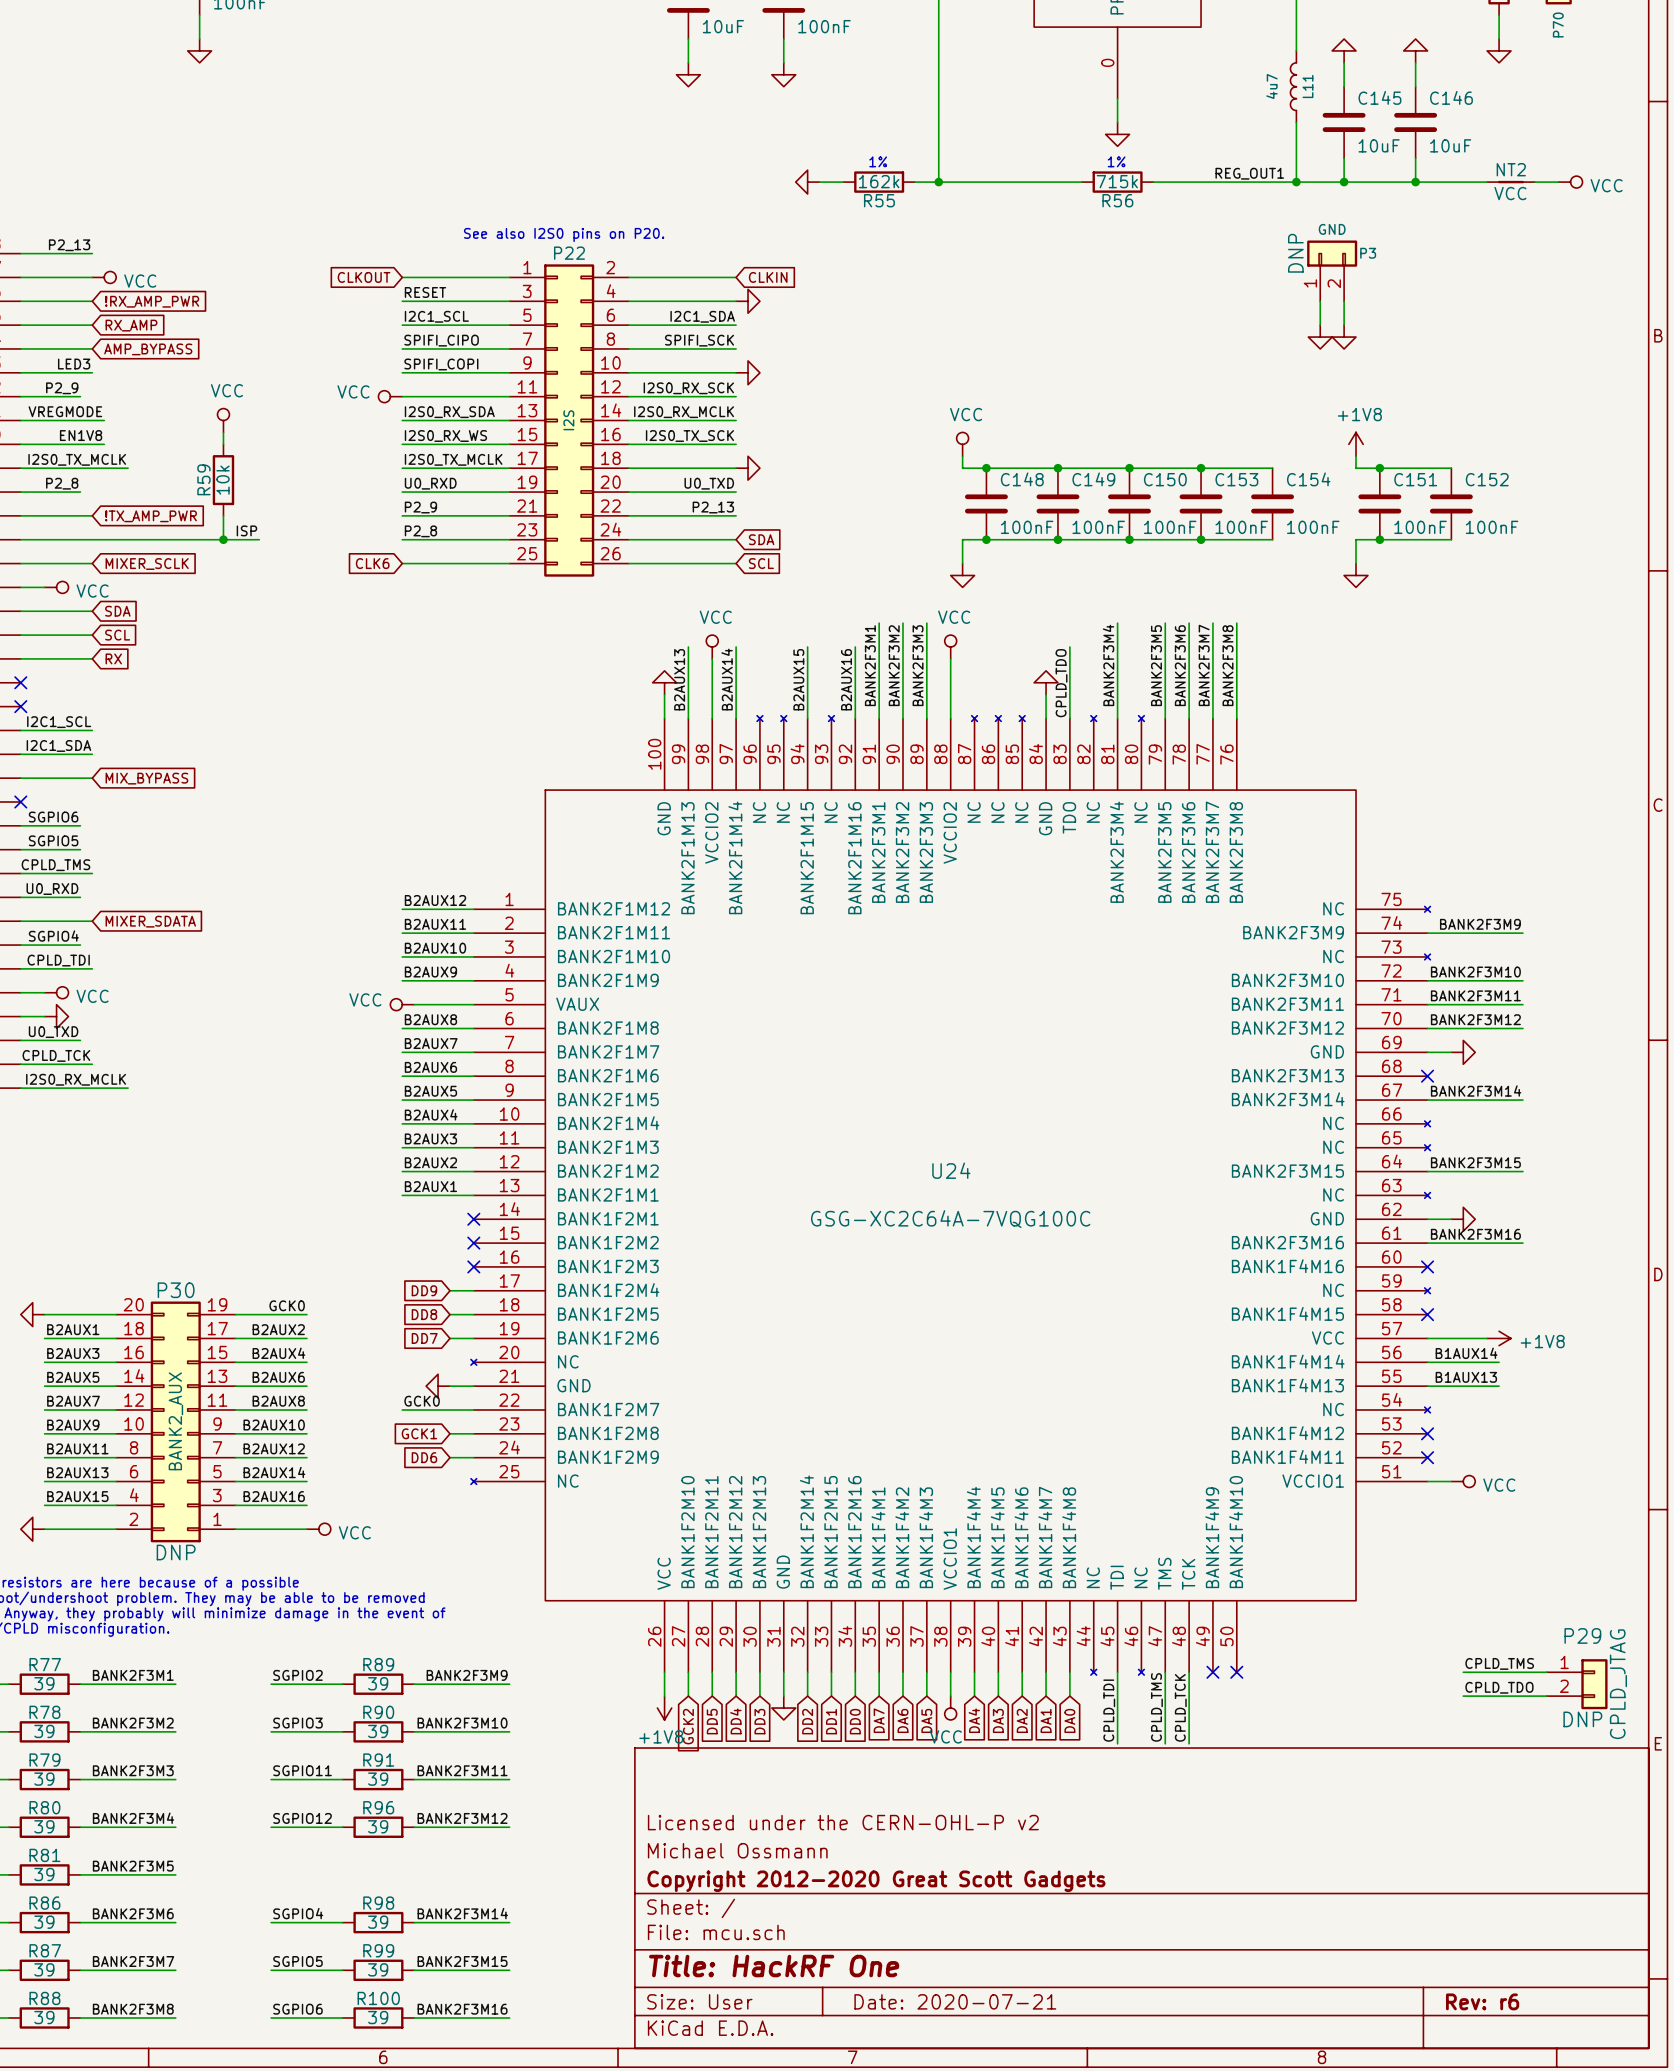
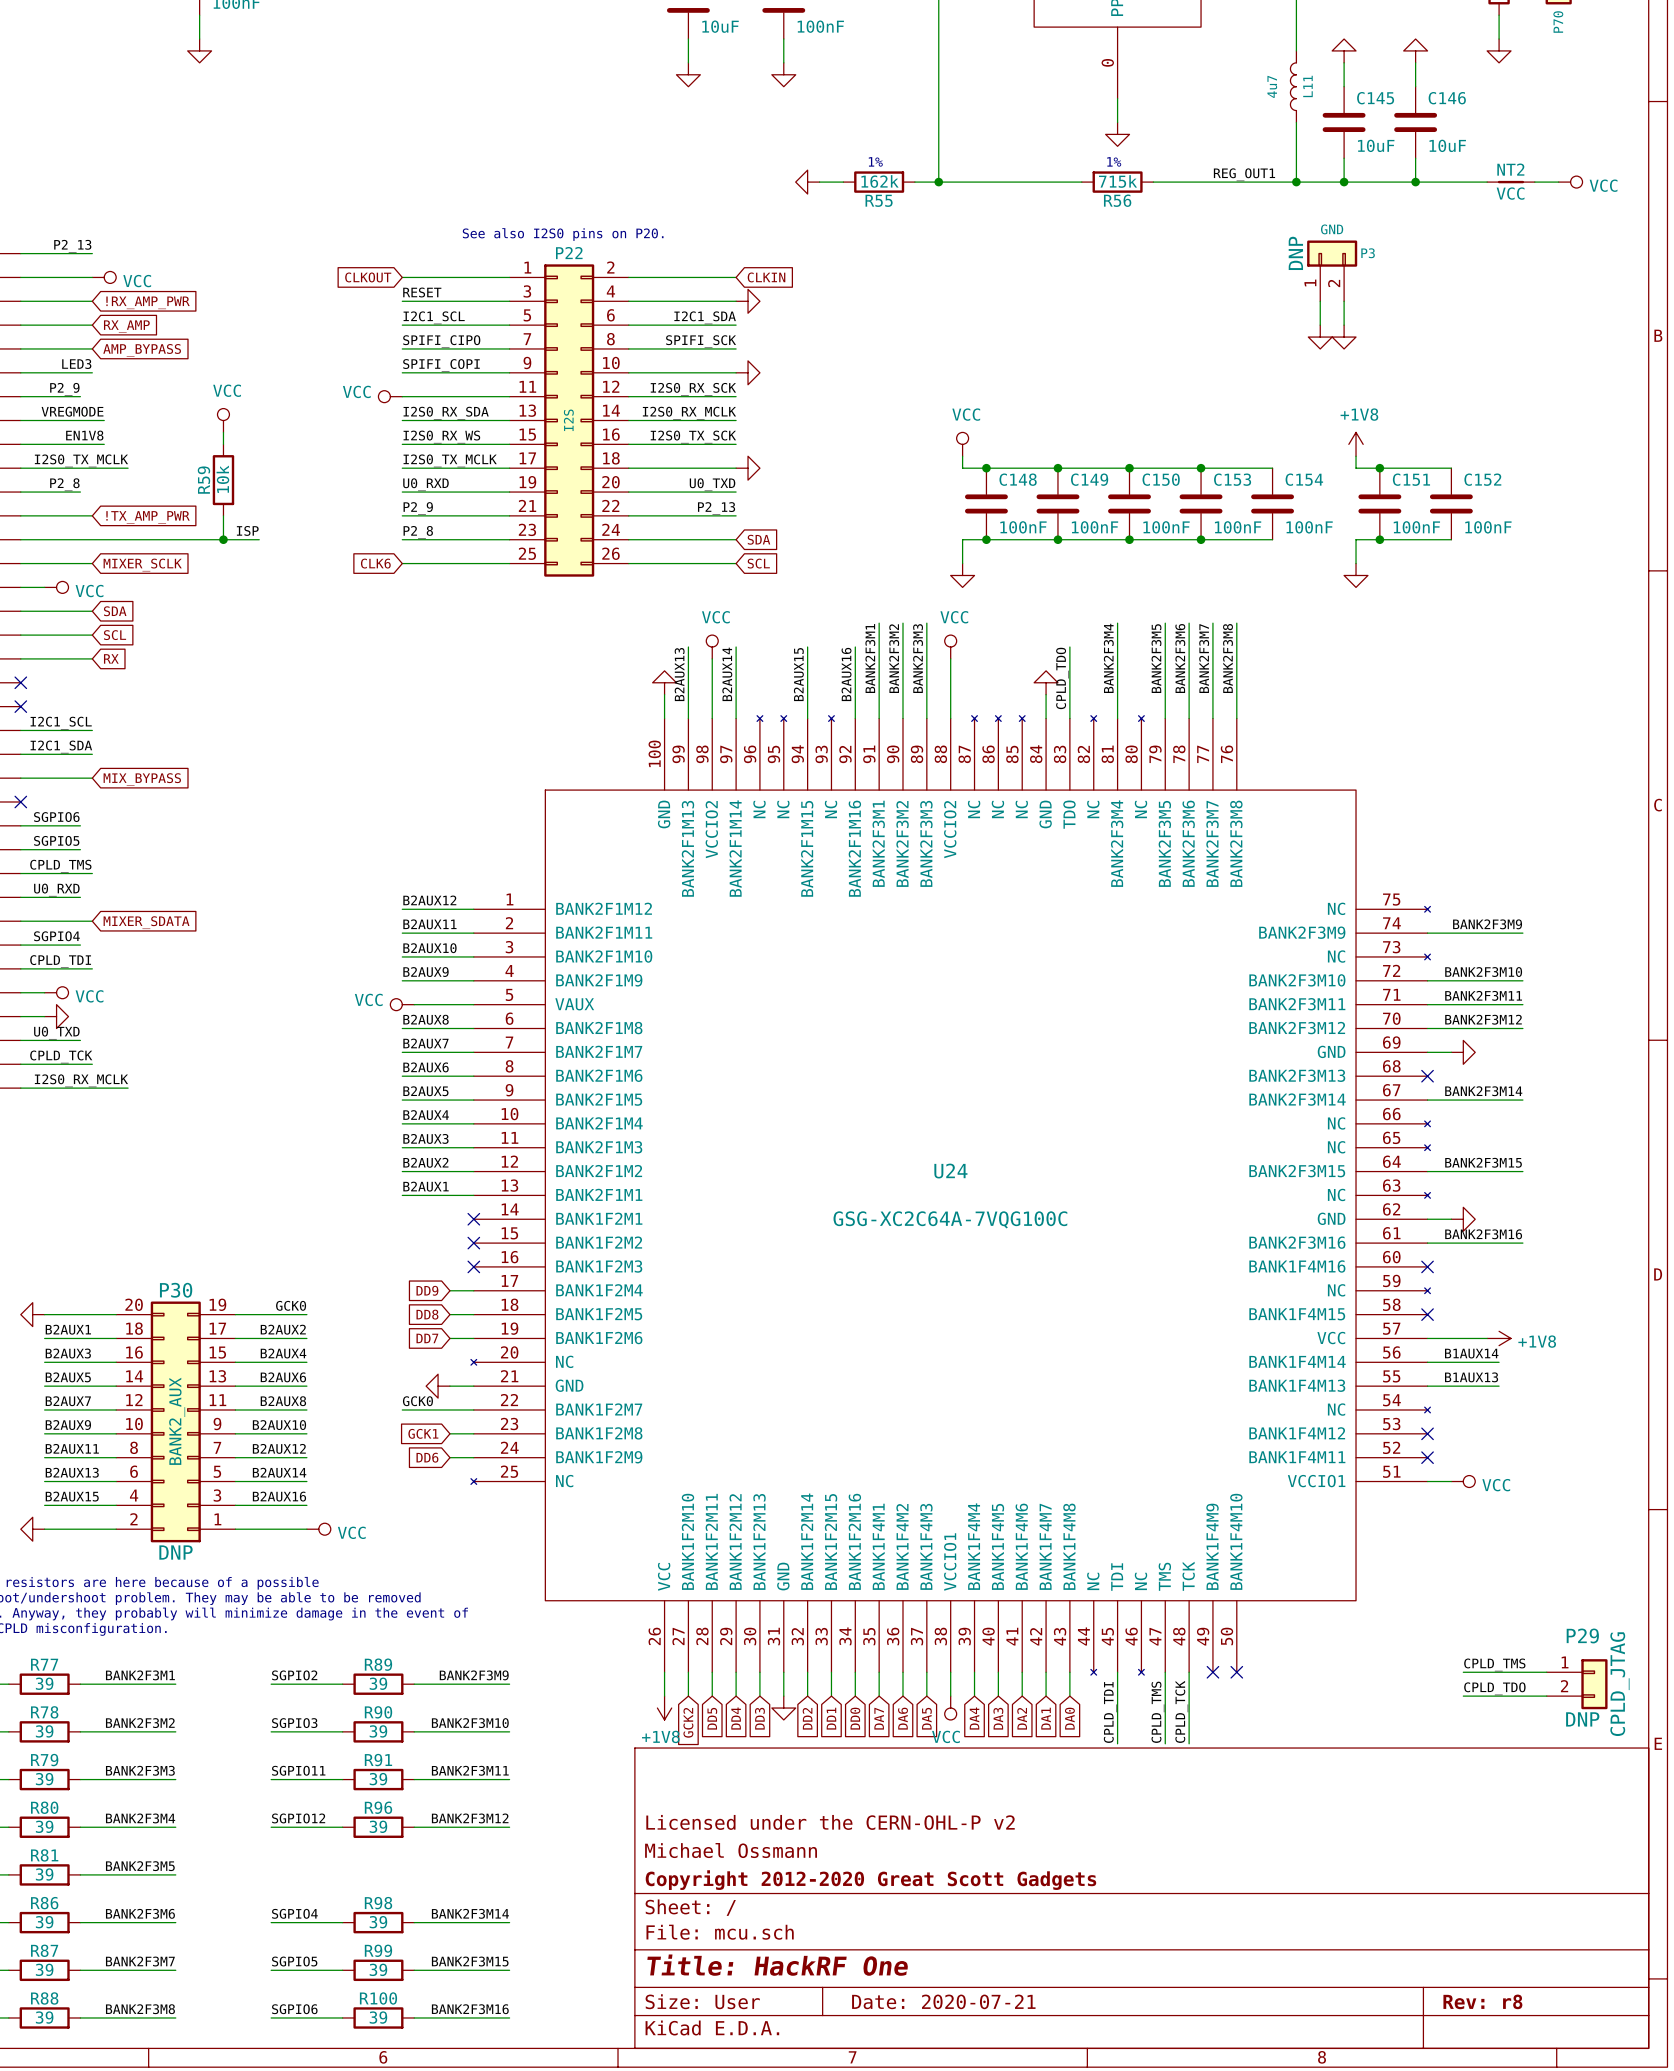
title block: Rev: r6 (1482, 2001) -> Rev: r8 (1482, 2001)

